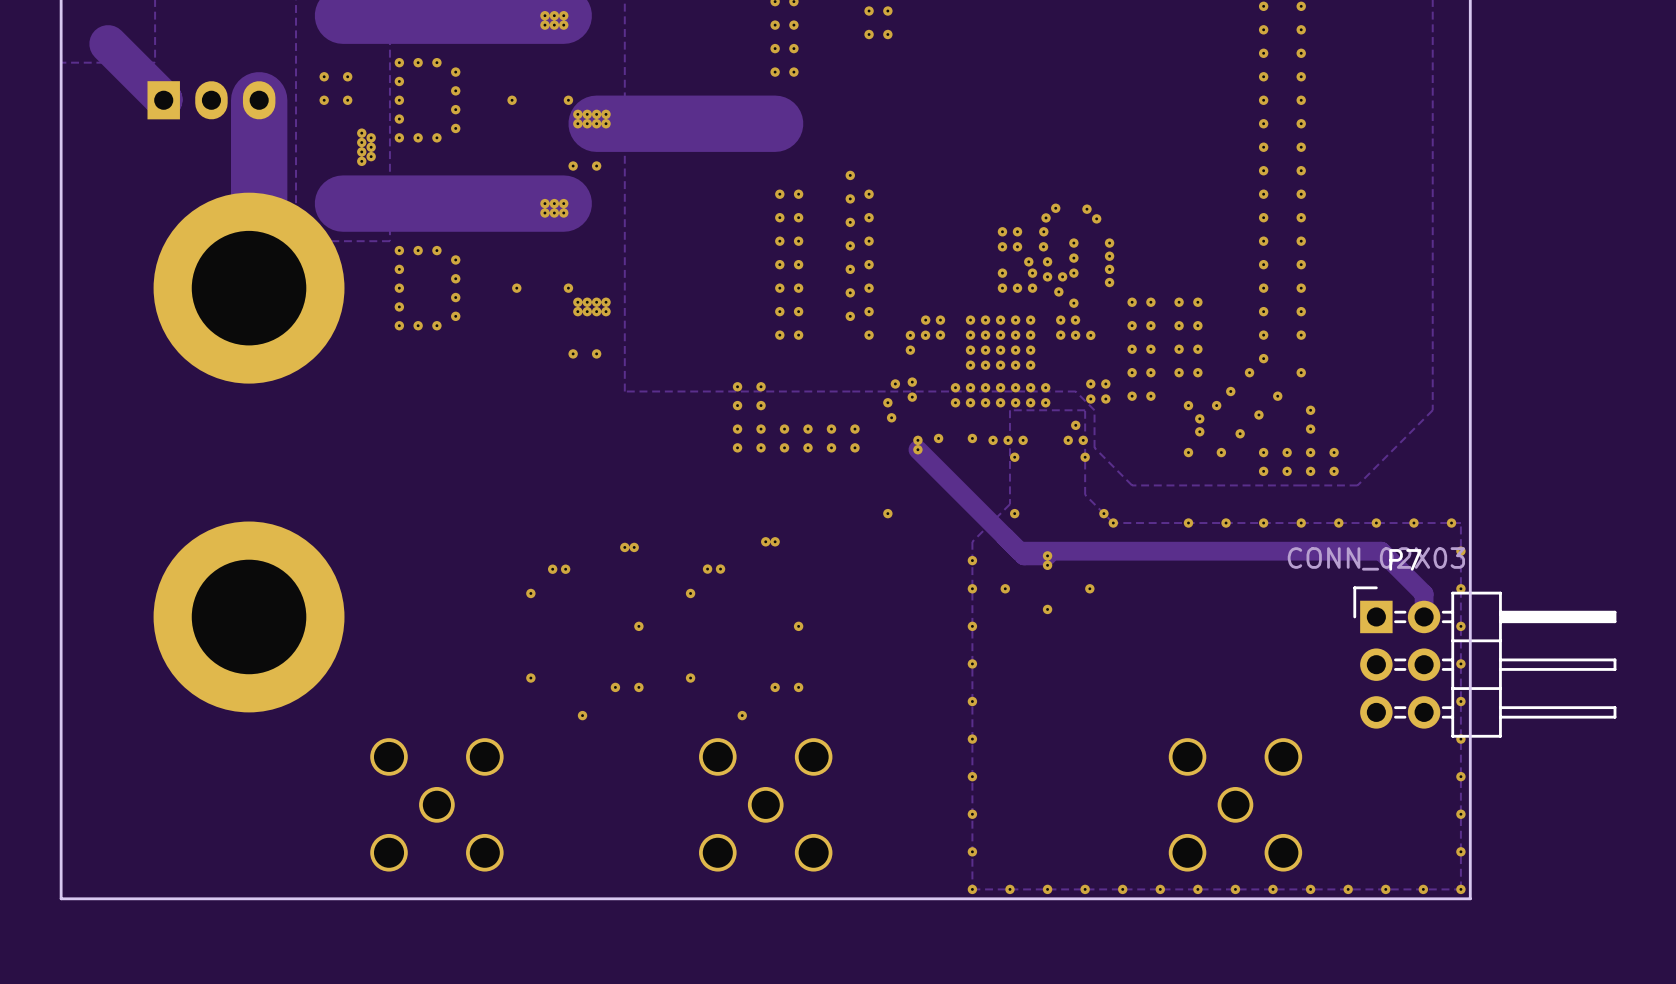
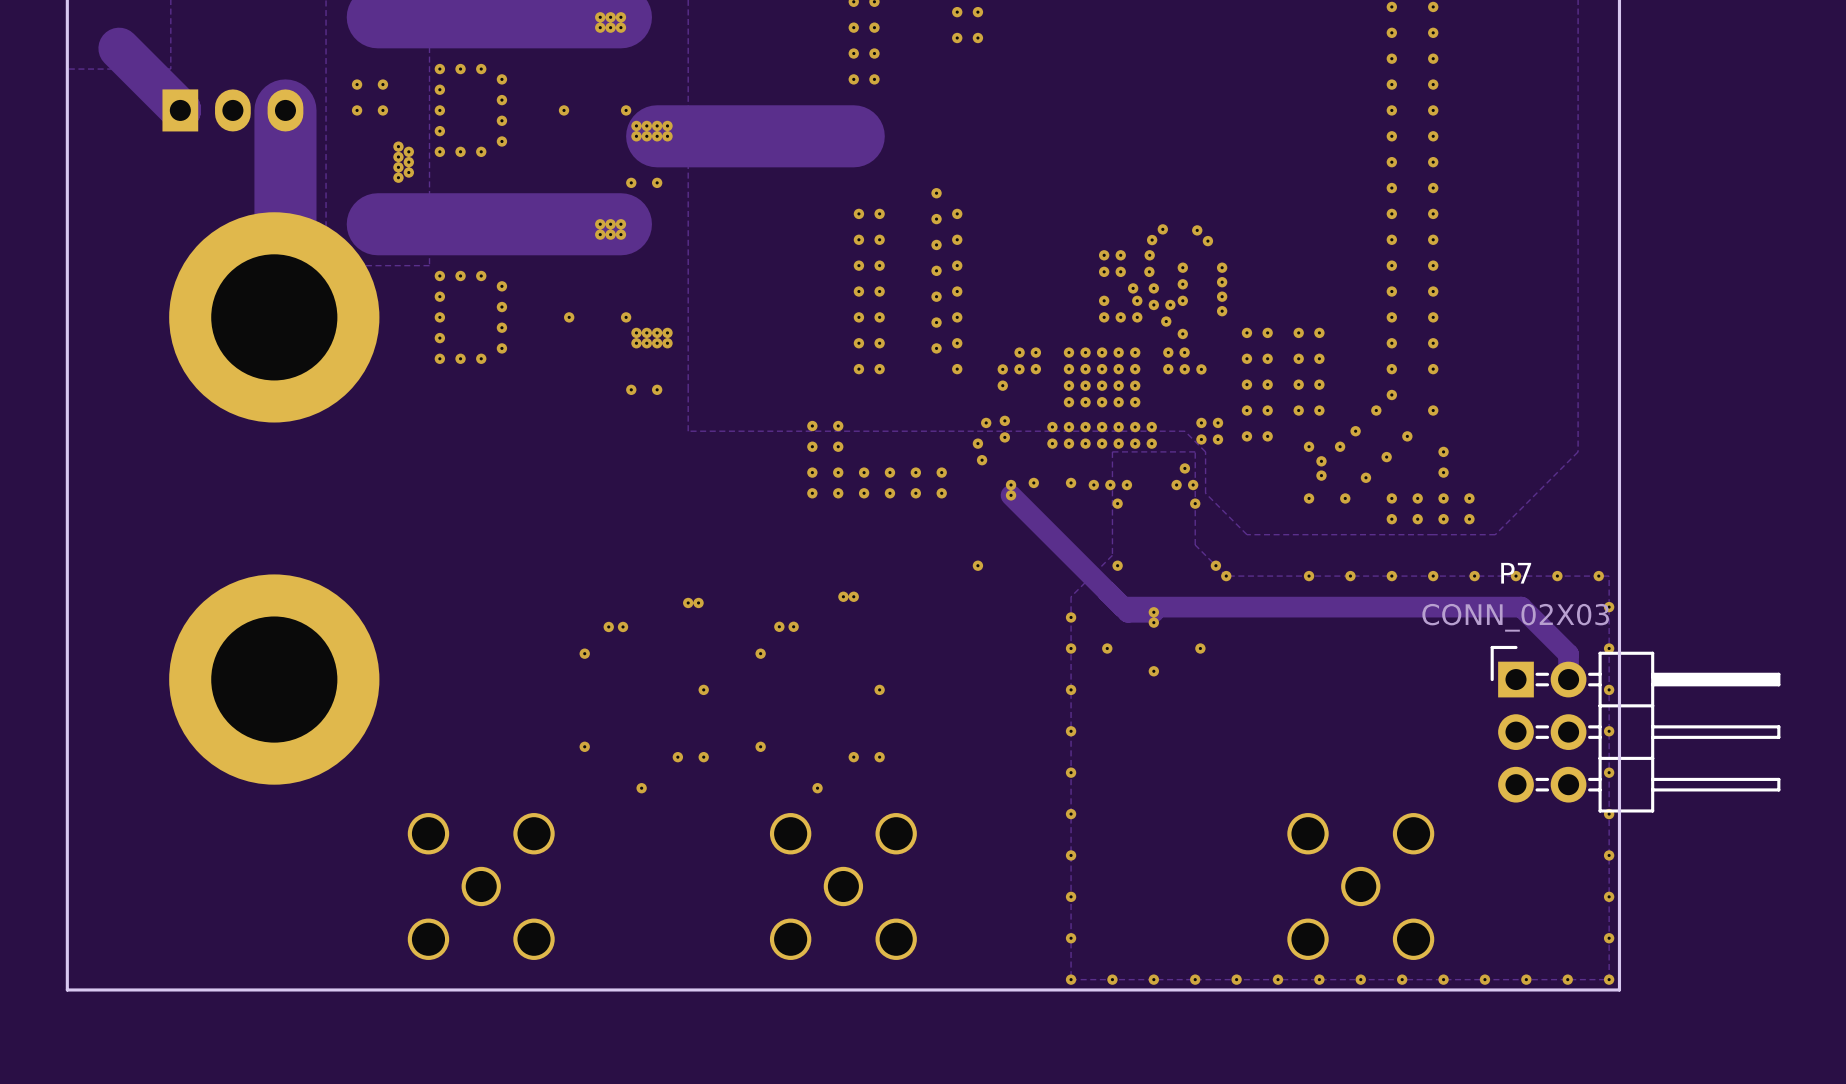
P7 name position: P7 (1405, 559) -> P7 (1516, 573)

